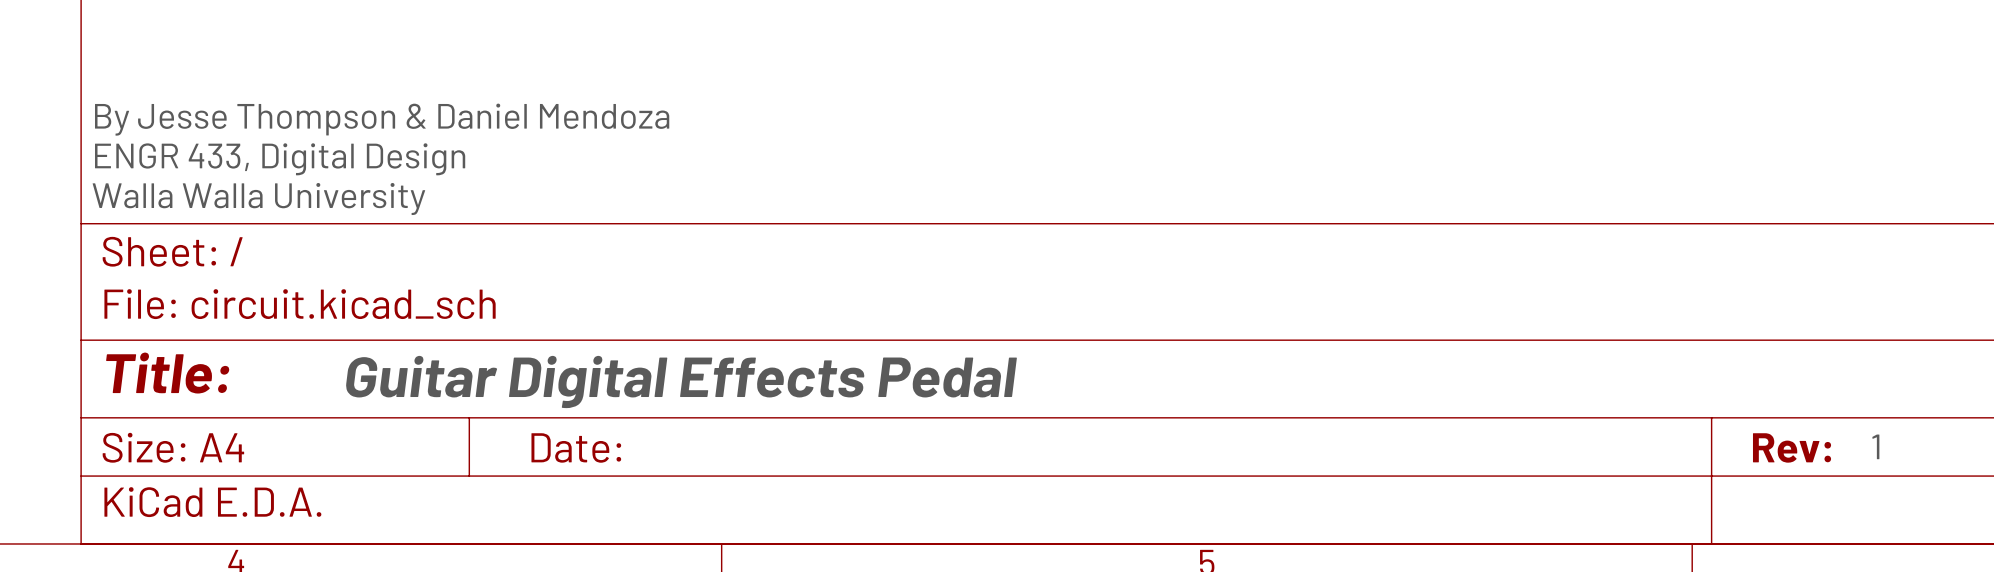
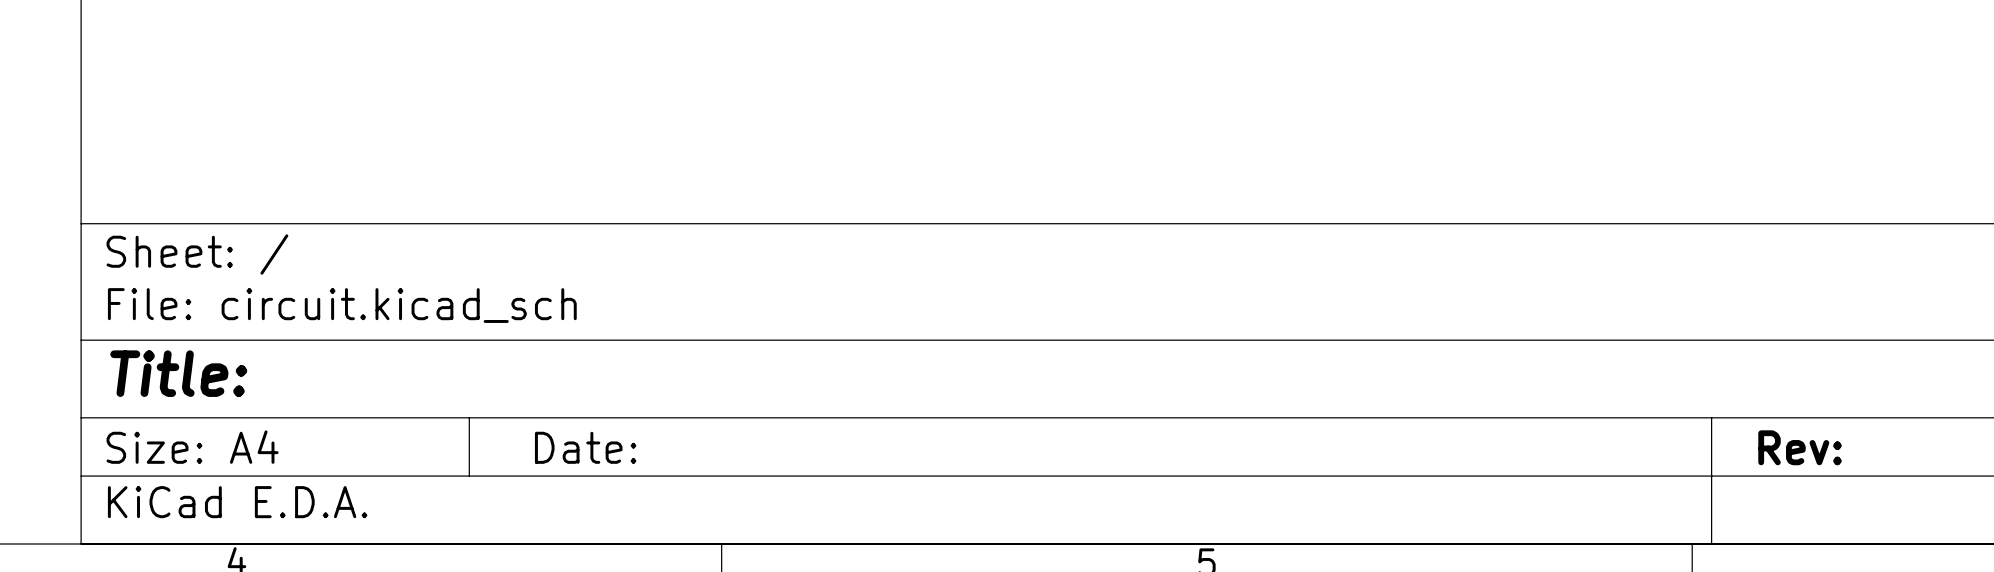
text: By Jesse Thompson & Daniel Mendoza (382, 119) -> none
text: ENGR 433, Digital Design (280, 159) -> none
text: Walla Walla University (258, 199) -> none
text: Guitar Digital Effects Pedal (681, 382) -> none
text: 1 (1875, 446) -> none

